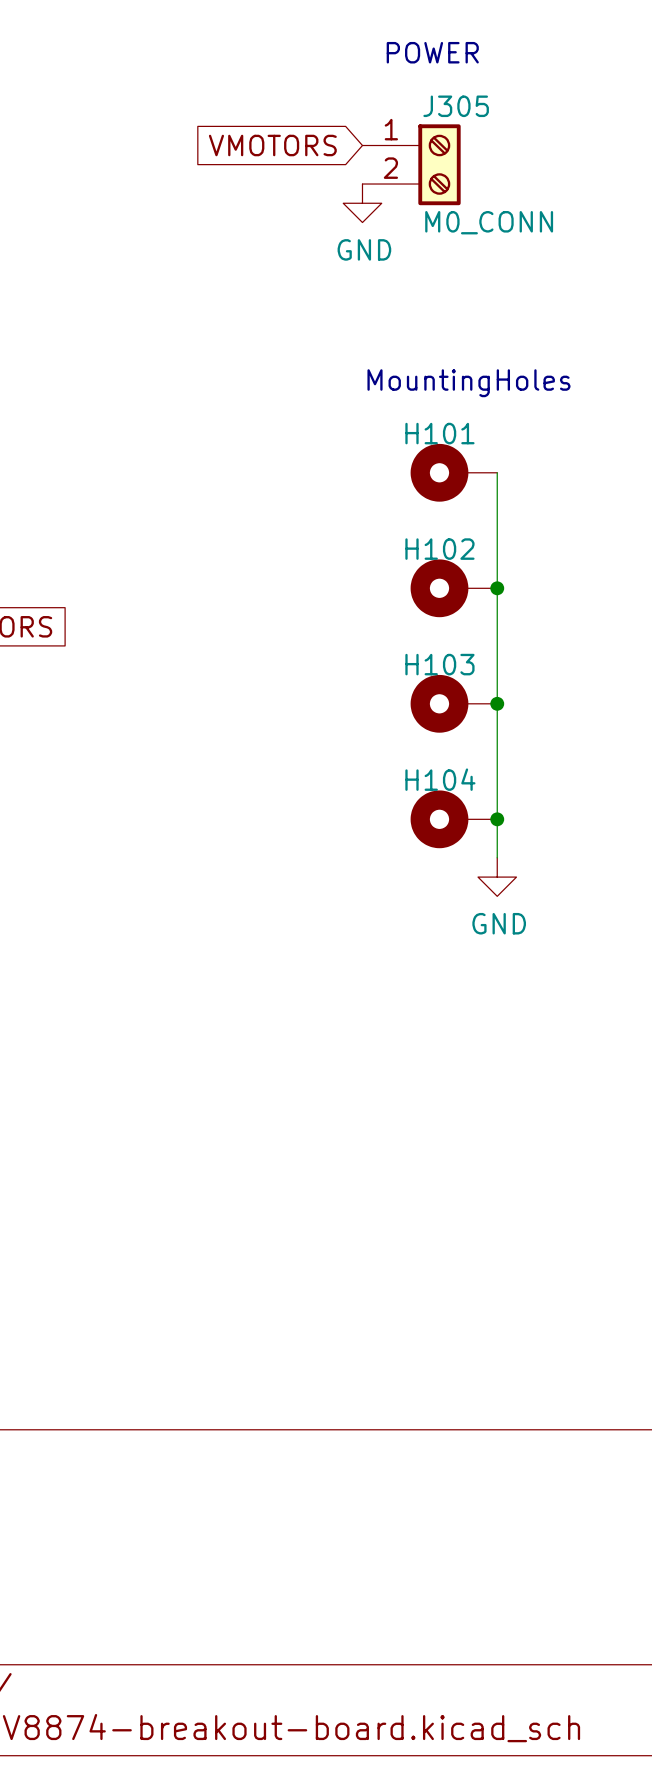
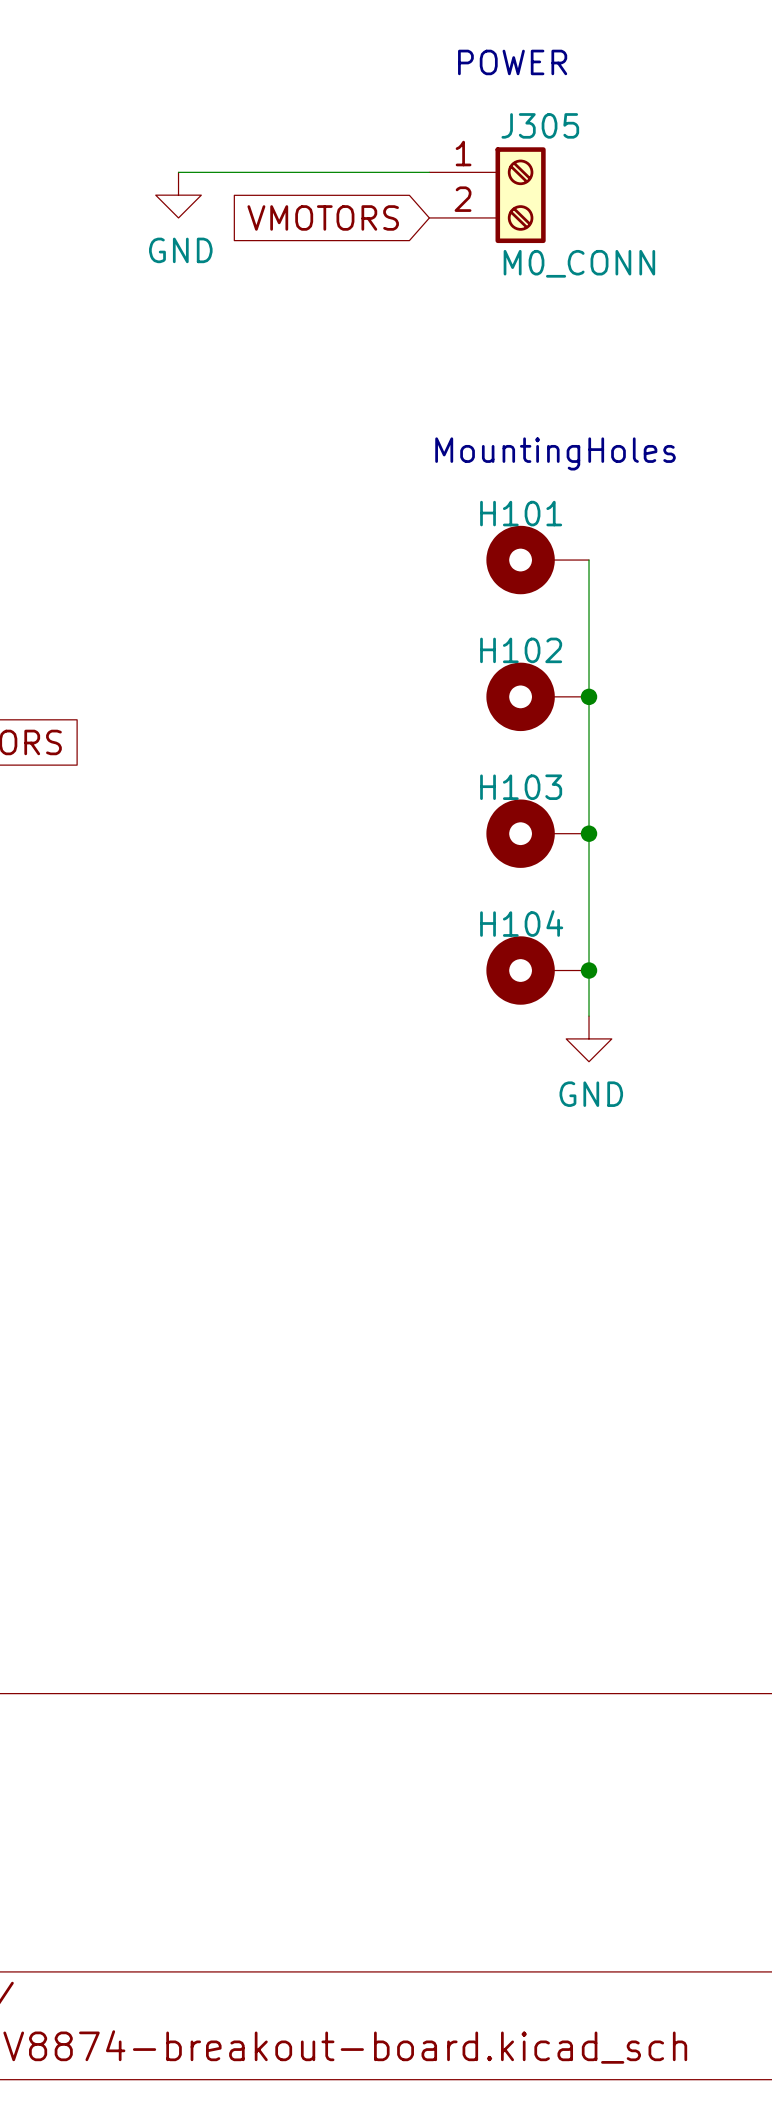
wire: none -> (178, 172) (429, 172)
global label position: VMOTORS (272, 145) -> VMOTORS (323, 217)
power symbol position: GND (362, 203) -> GND (178, 195)

